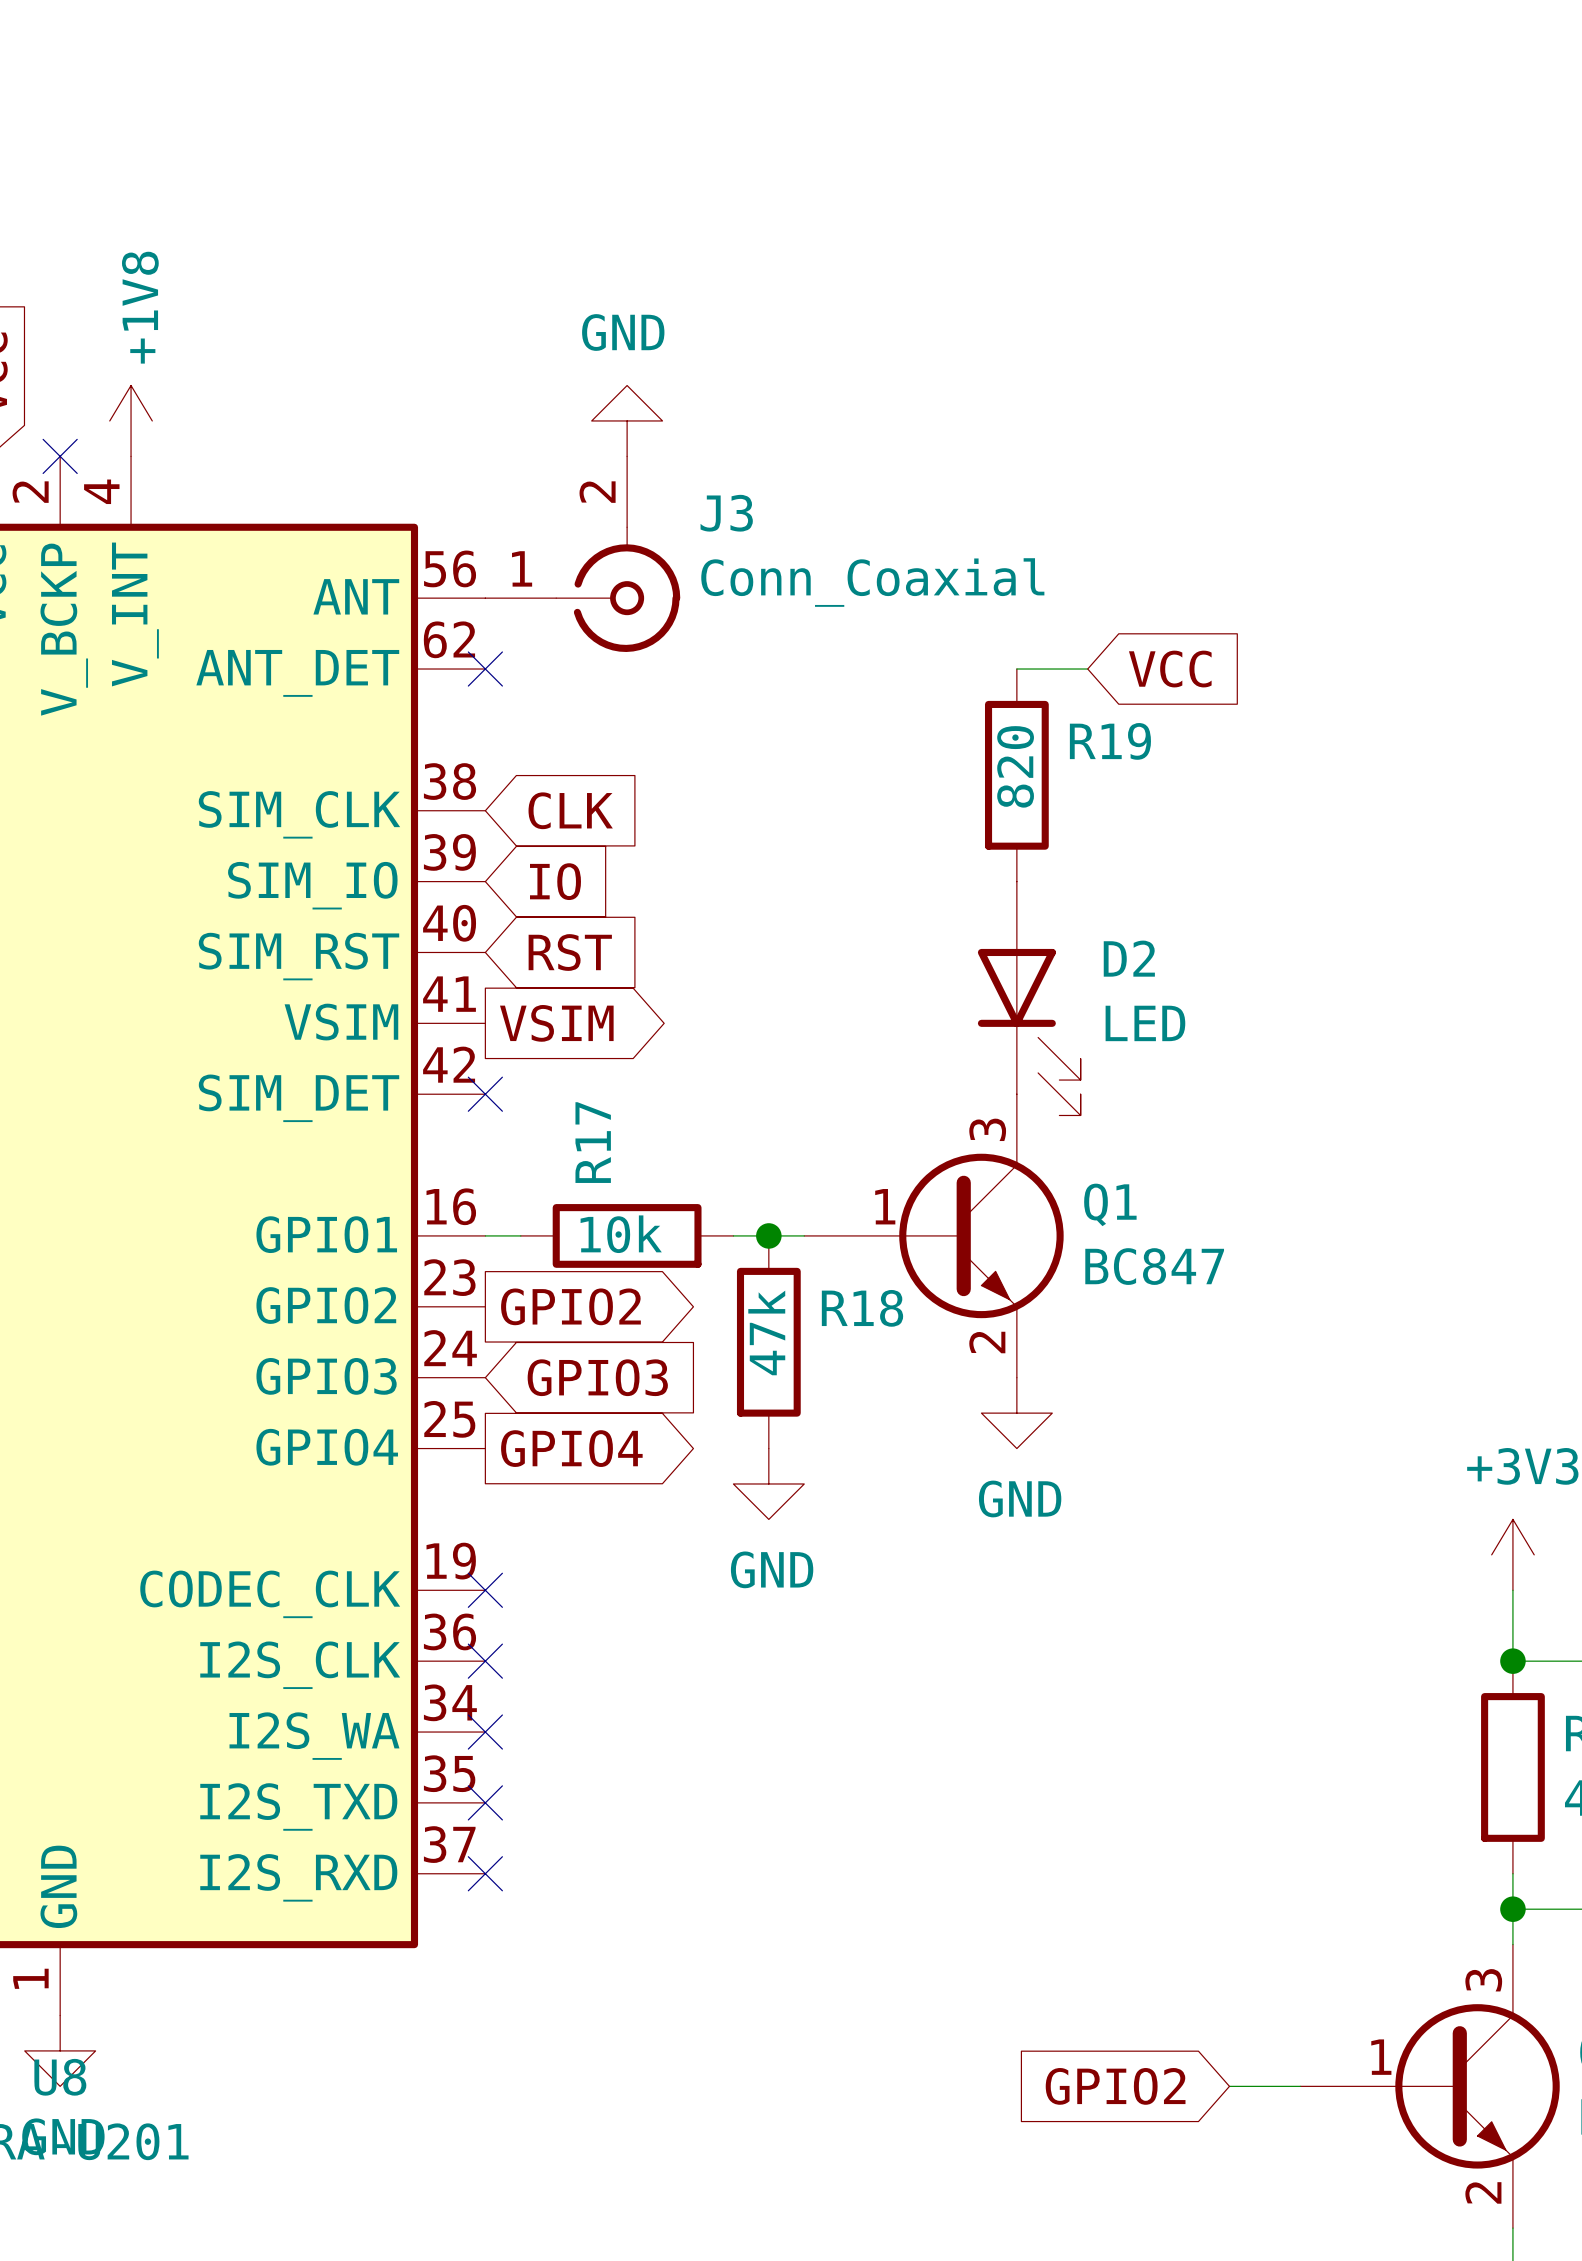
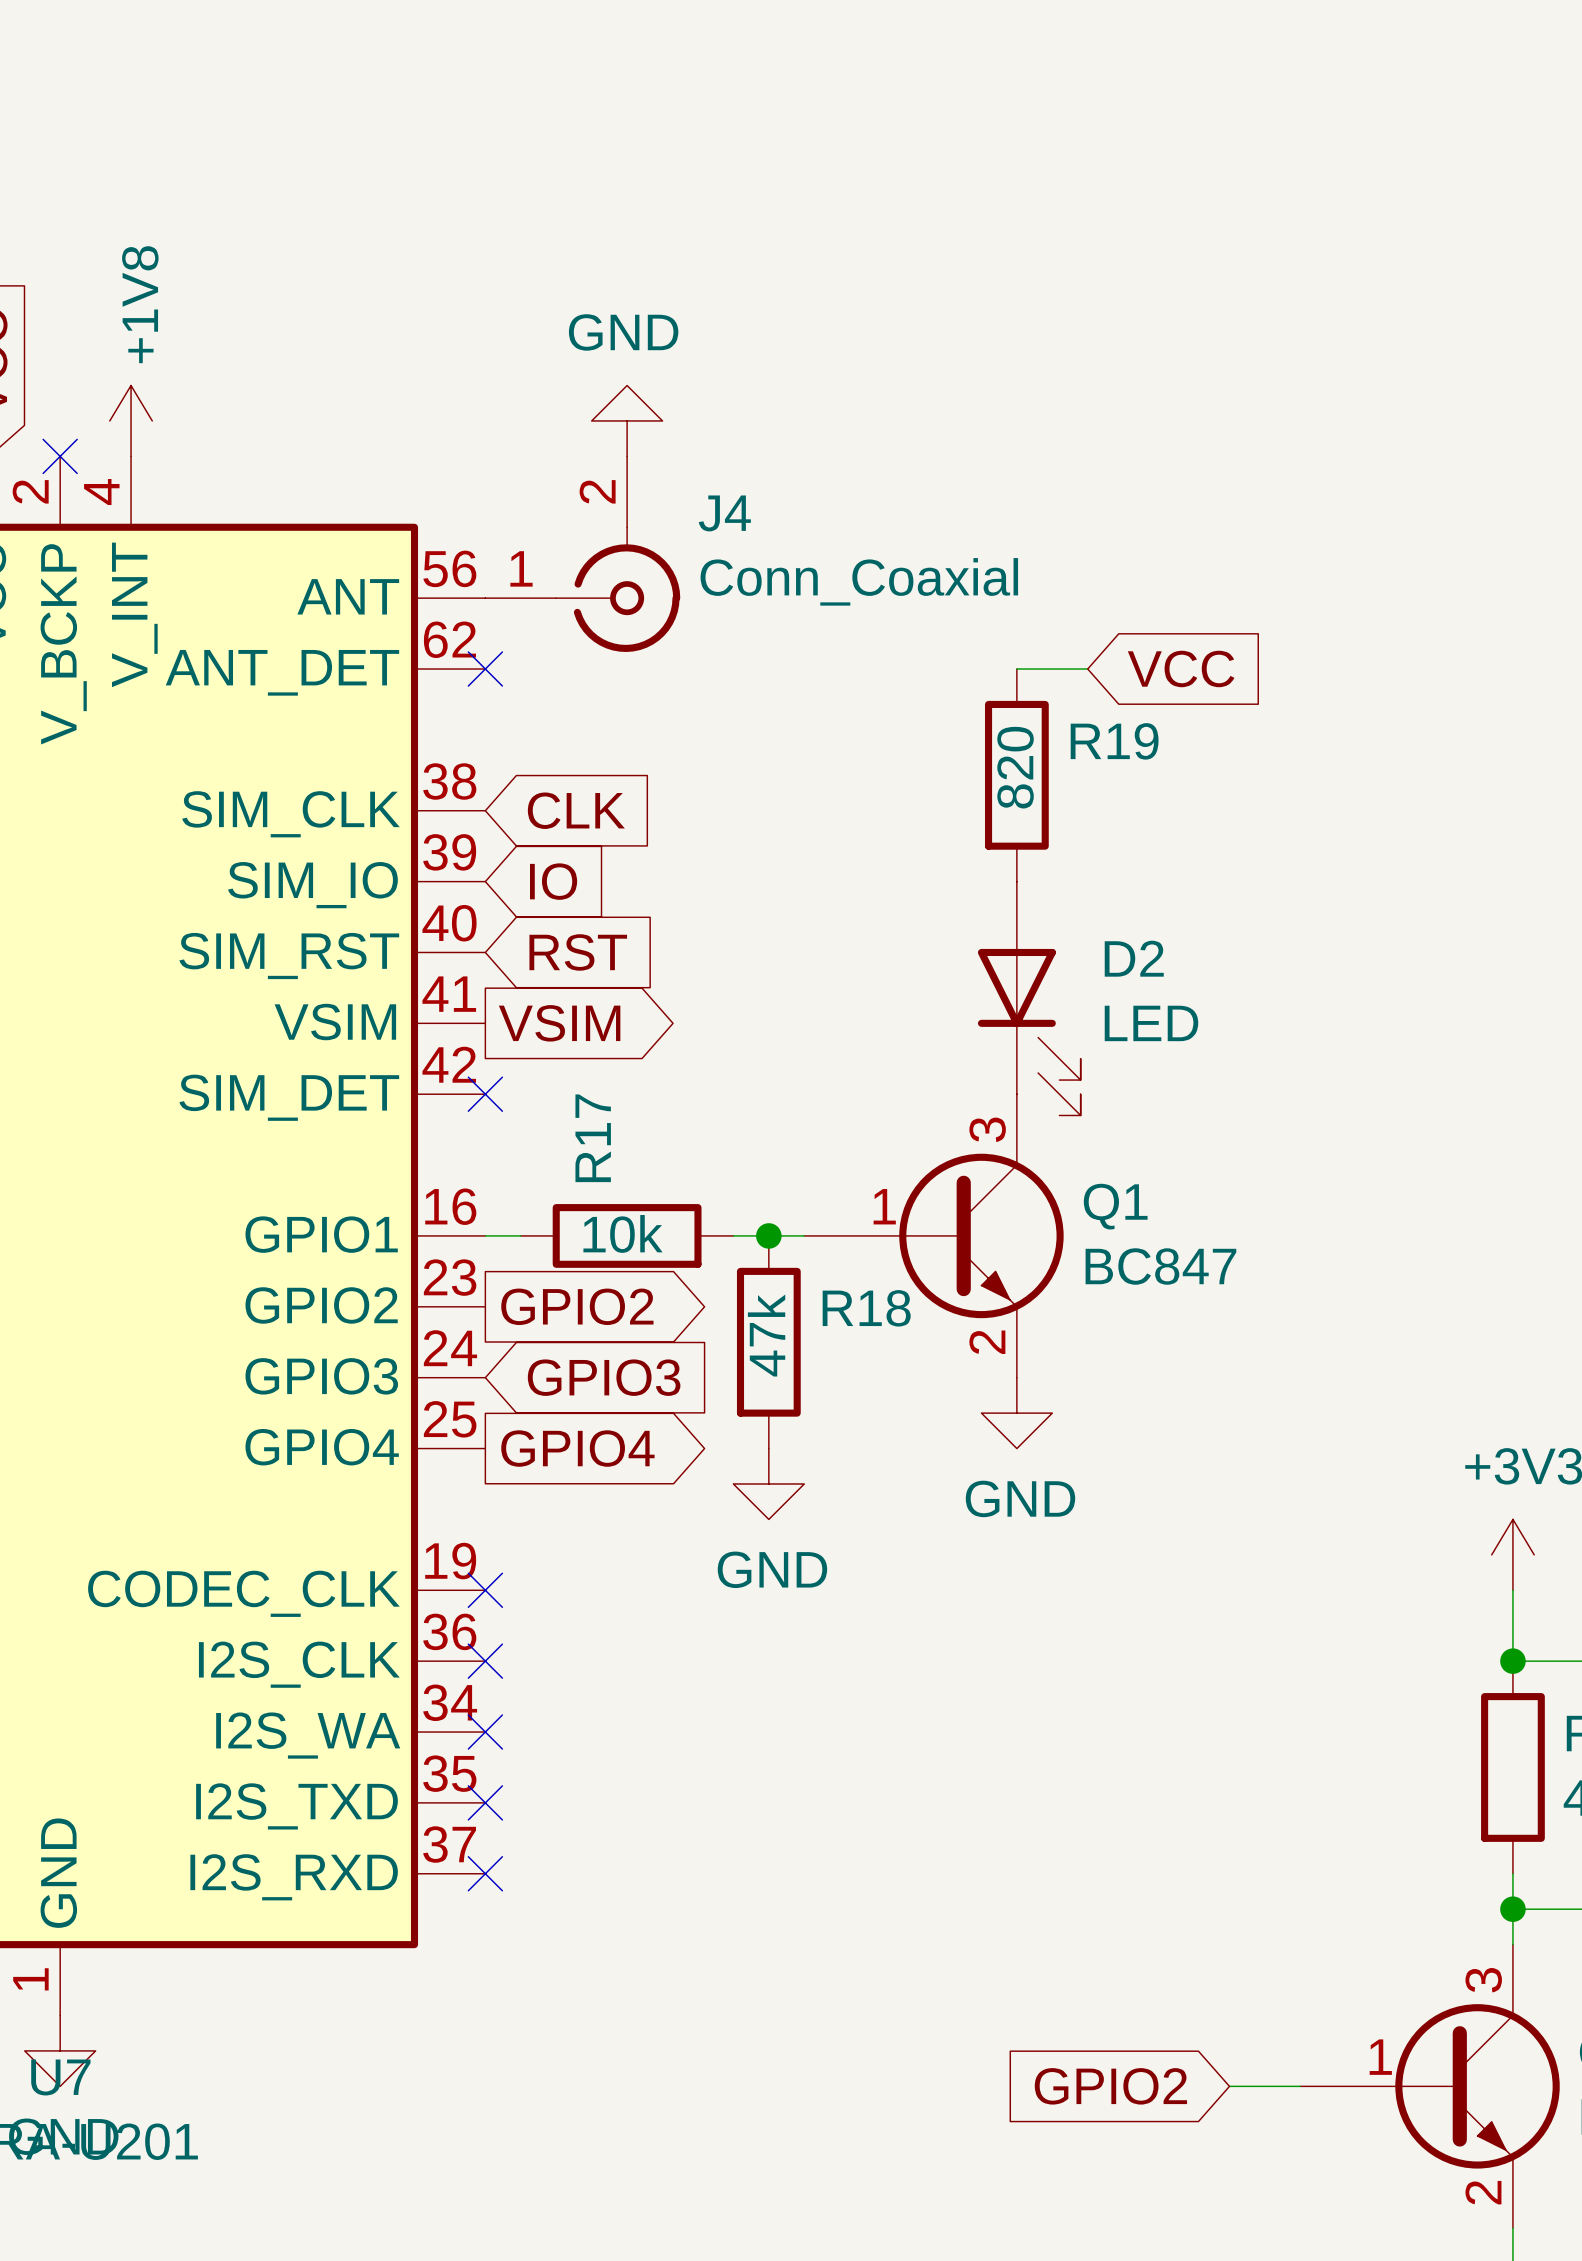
J3 name: J3 (726, 513) -> J4 (724, 513)
U8 name: U8 (60, 2077) -> U7 (60, 2077)

